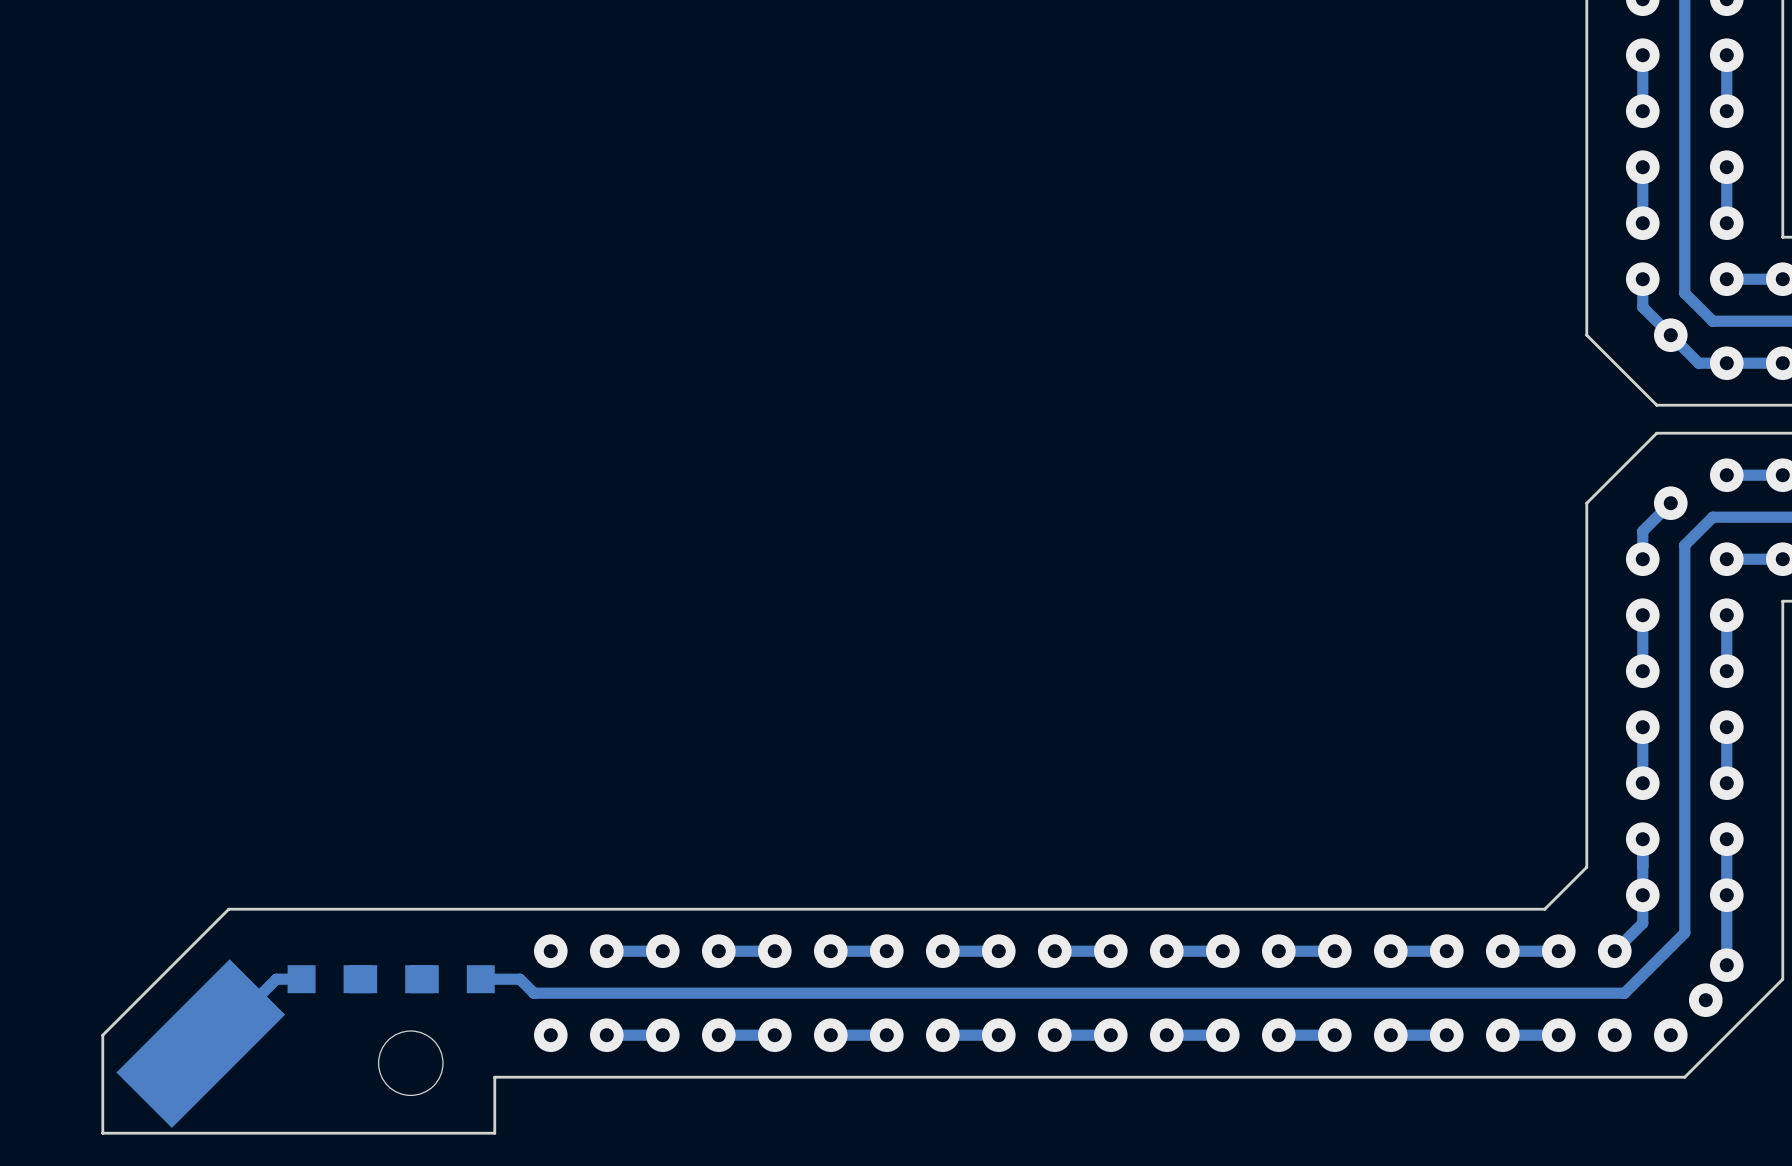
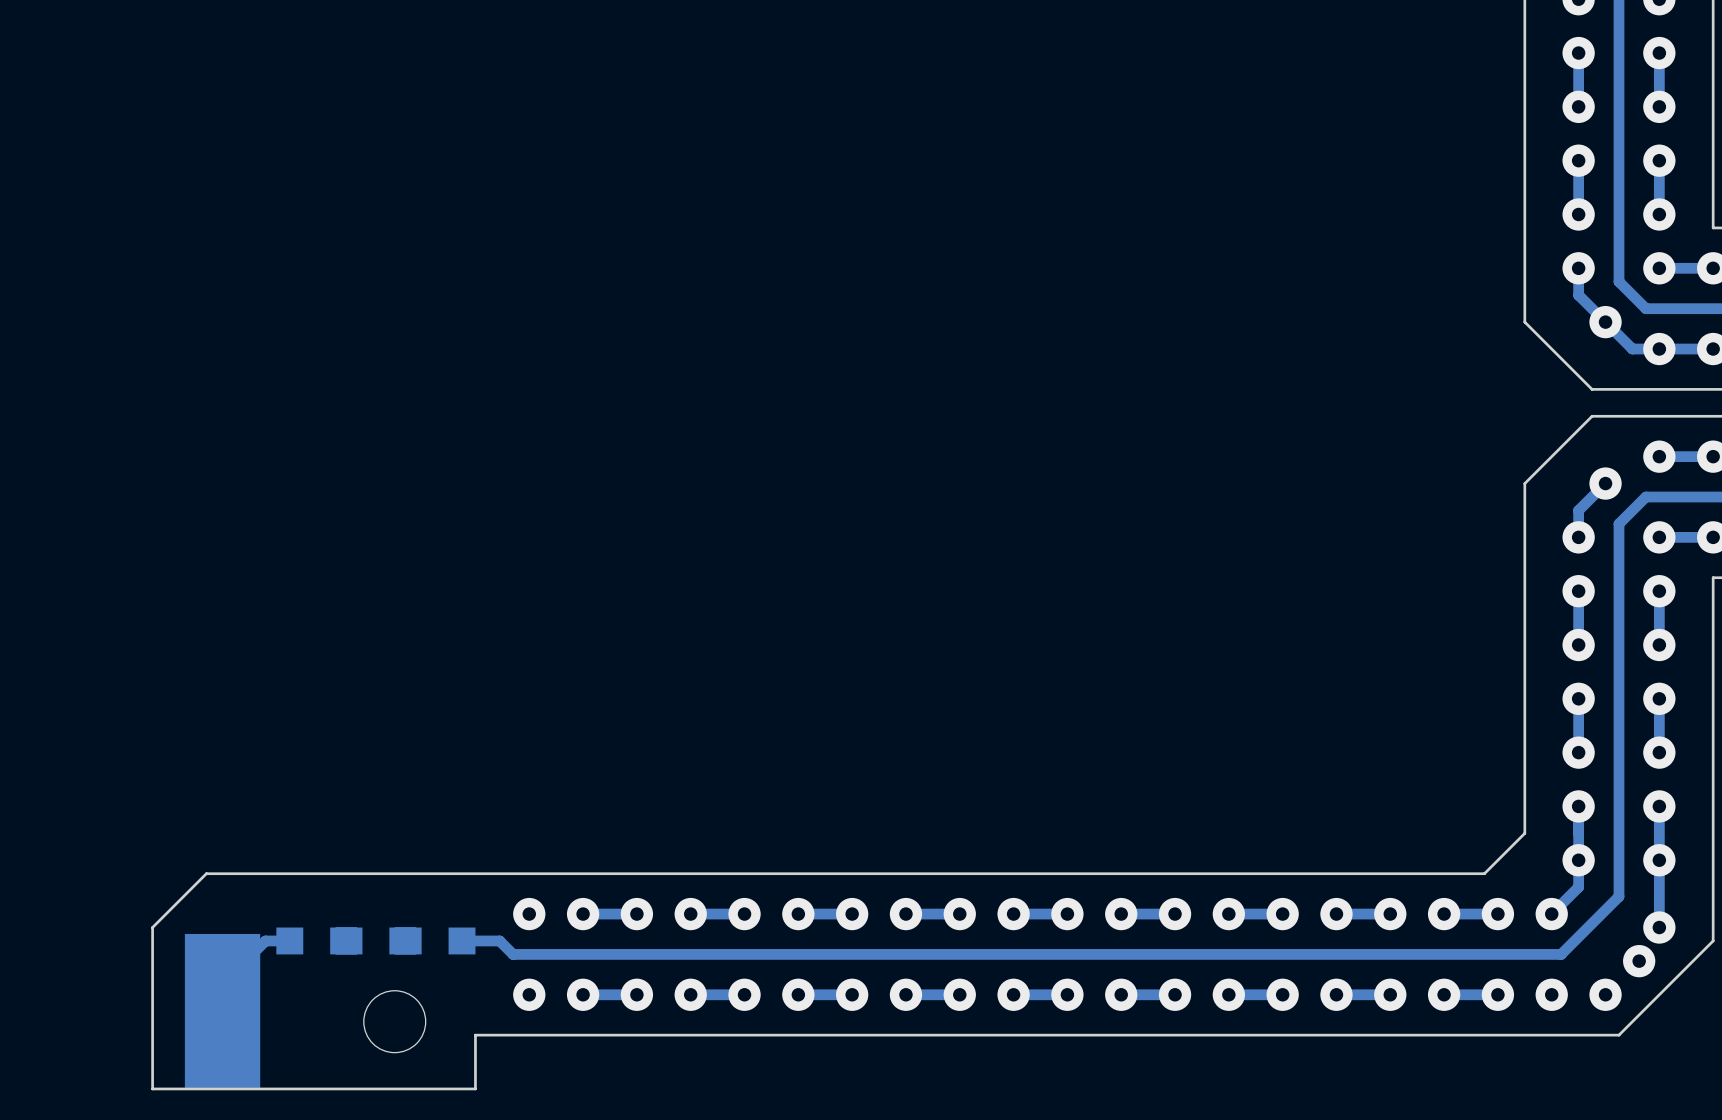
board edge: (228, 909) (102, 1035) (102, 1133) (158, 1133) -> (219, 873) (206, 873) (152, 927) (152, 1088)
part rotation: 0° (200, 1043) -> 45° counterclockwise (222, 1010)

